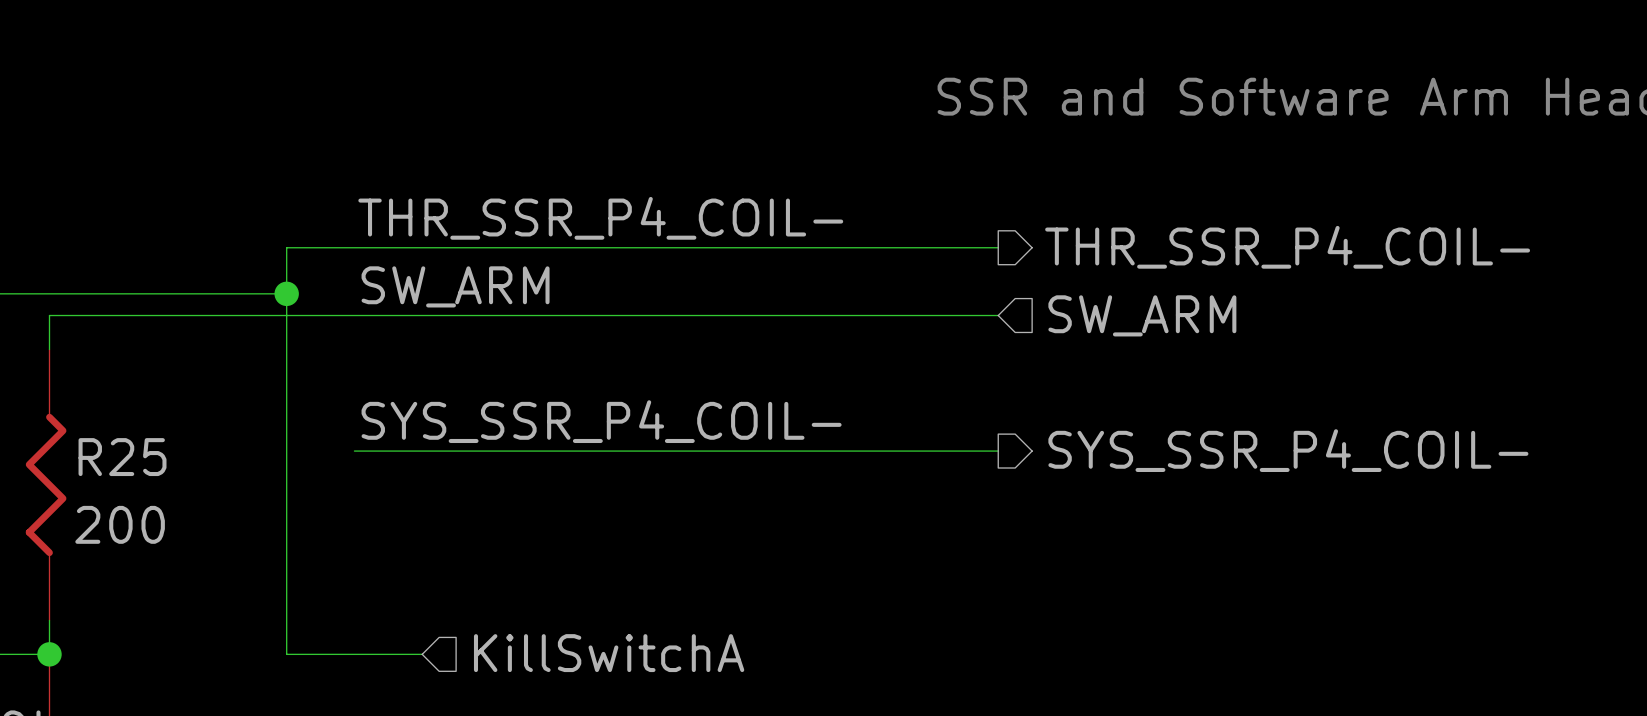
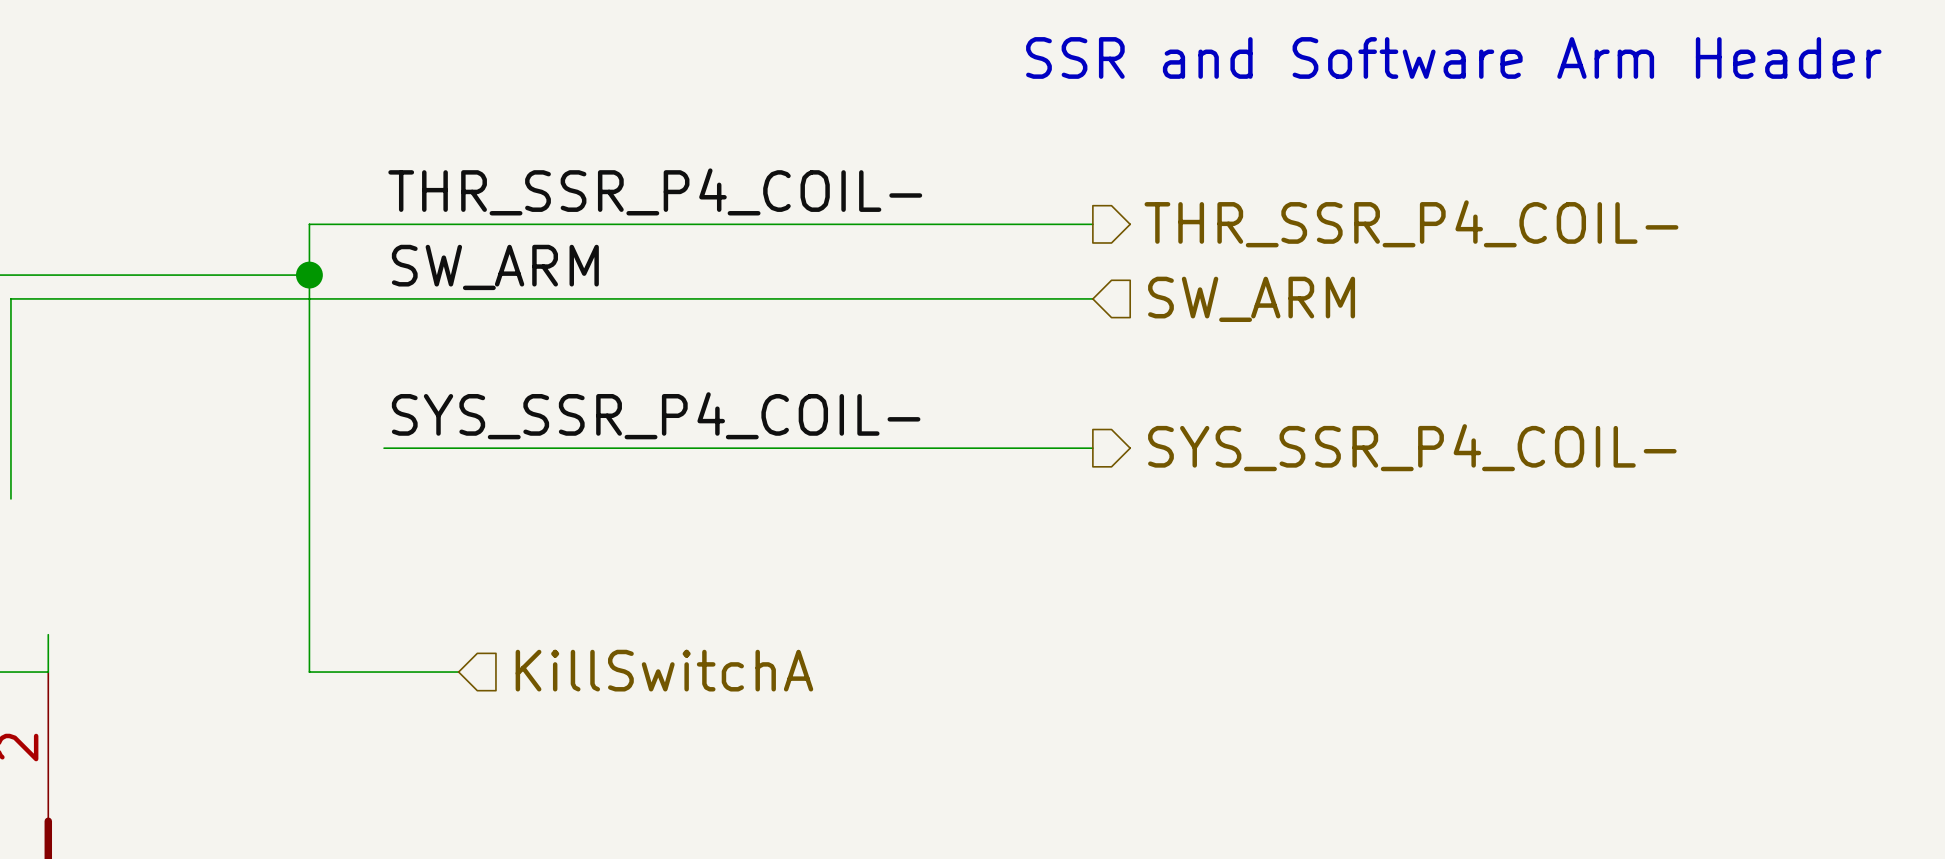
wire: (49, 315) (49, 349) -> (48, 298) (10, 298) (10, 498)
R25: 200 (46, 484) -> none
junction: (49, 654) -> none

